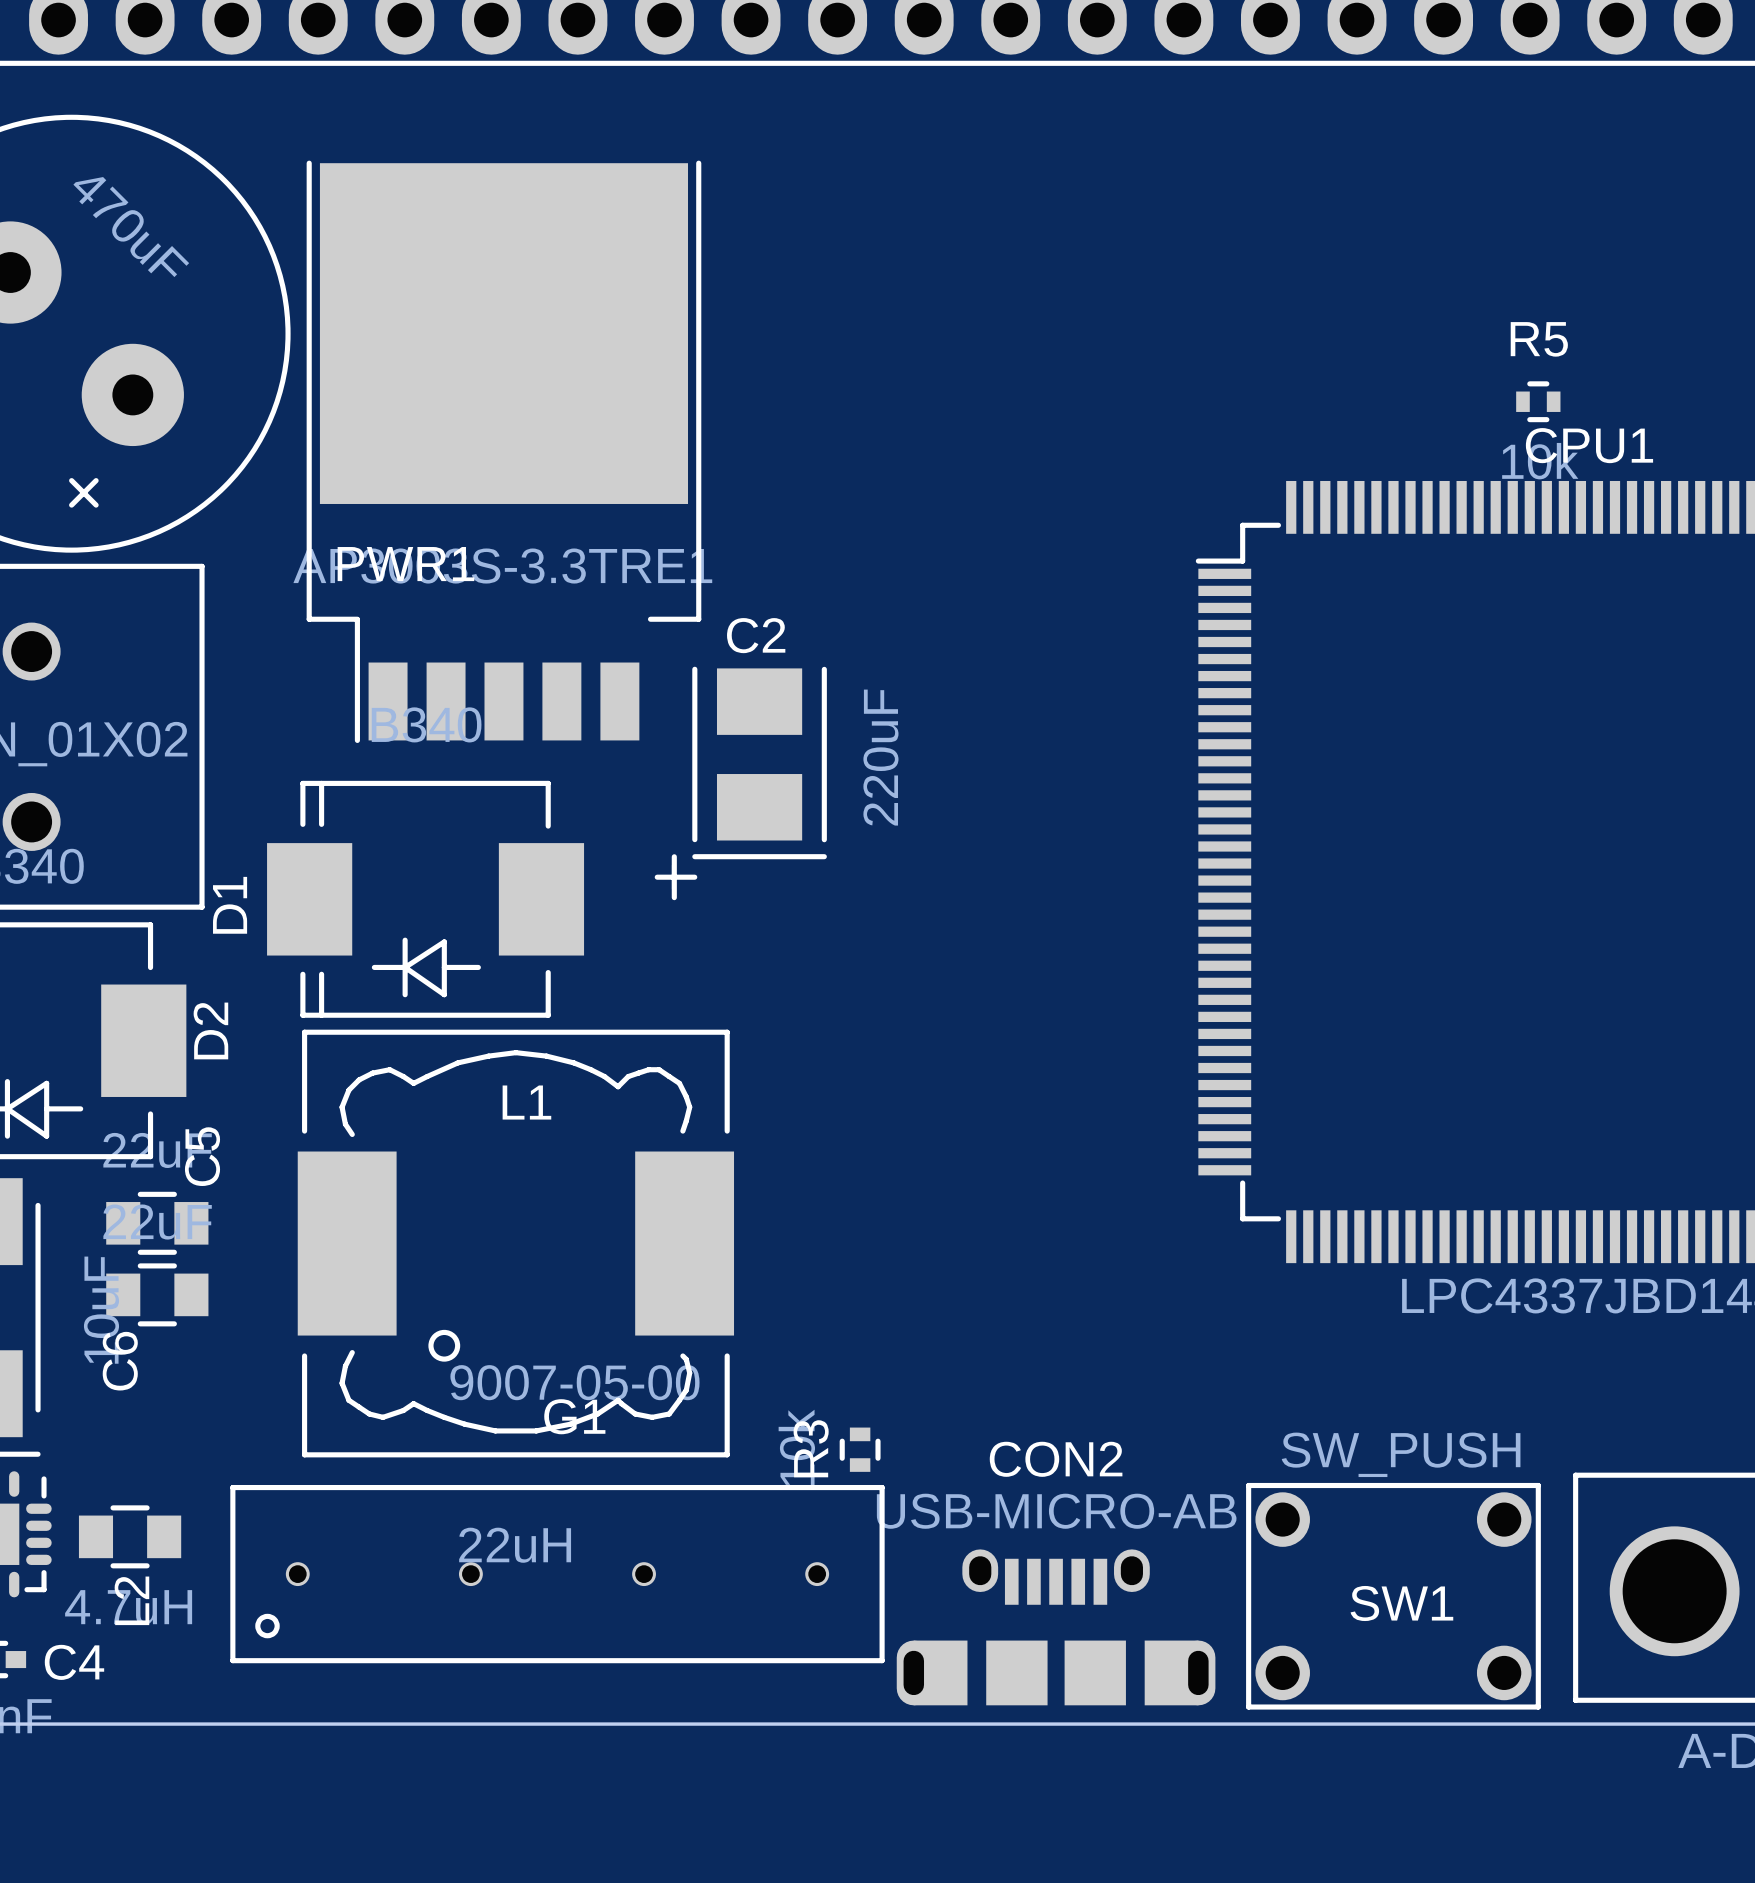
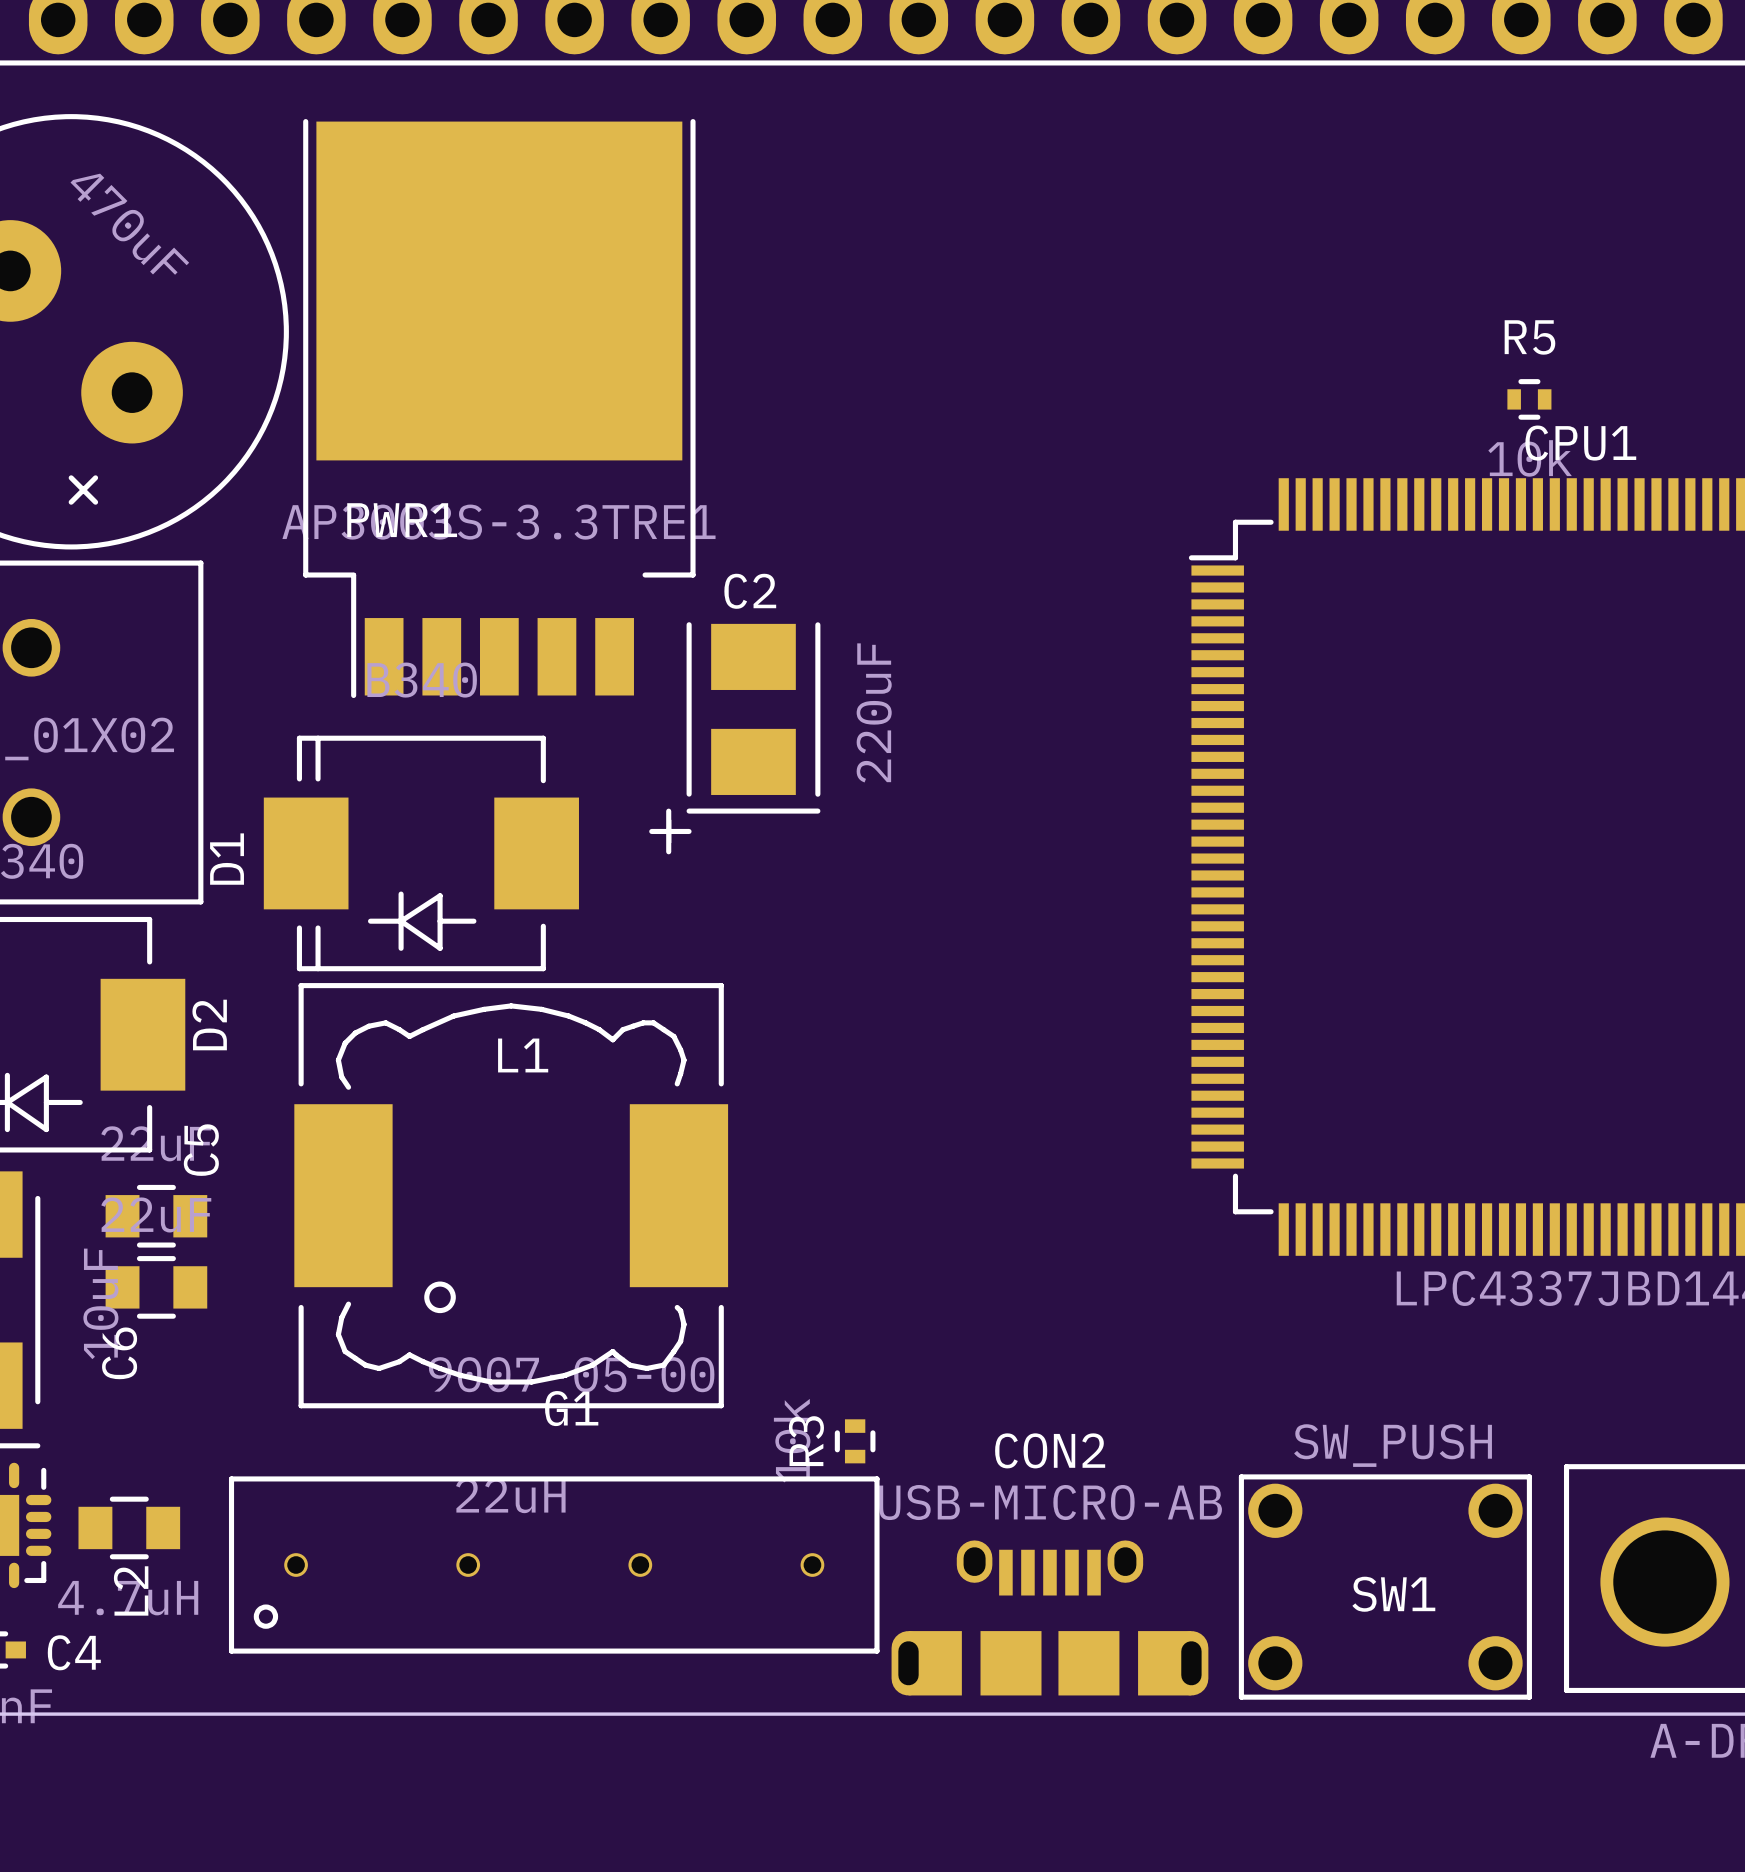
PWR1 position: (503, 451) -> (499, 408)
C2 position: (740, 783) -> (734, 738)
D1 position: (425, 899) -> (421, 853)
L1 position: (515, 1243) -> (511, 1195)

